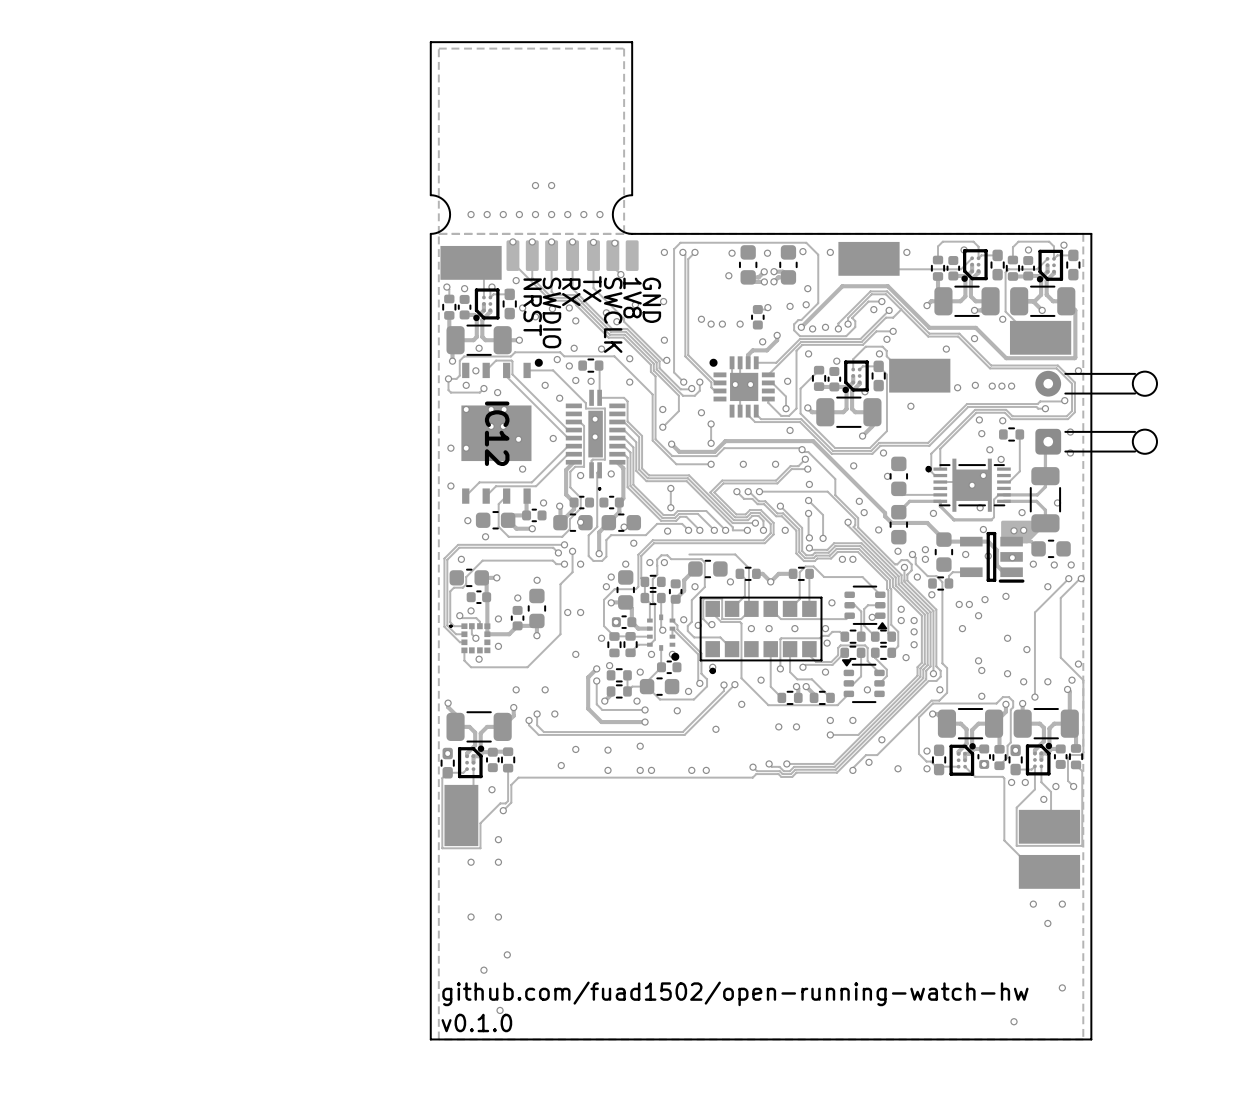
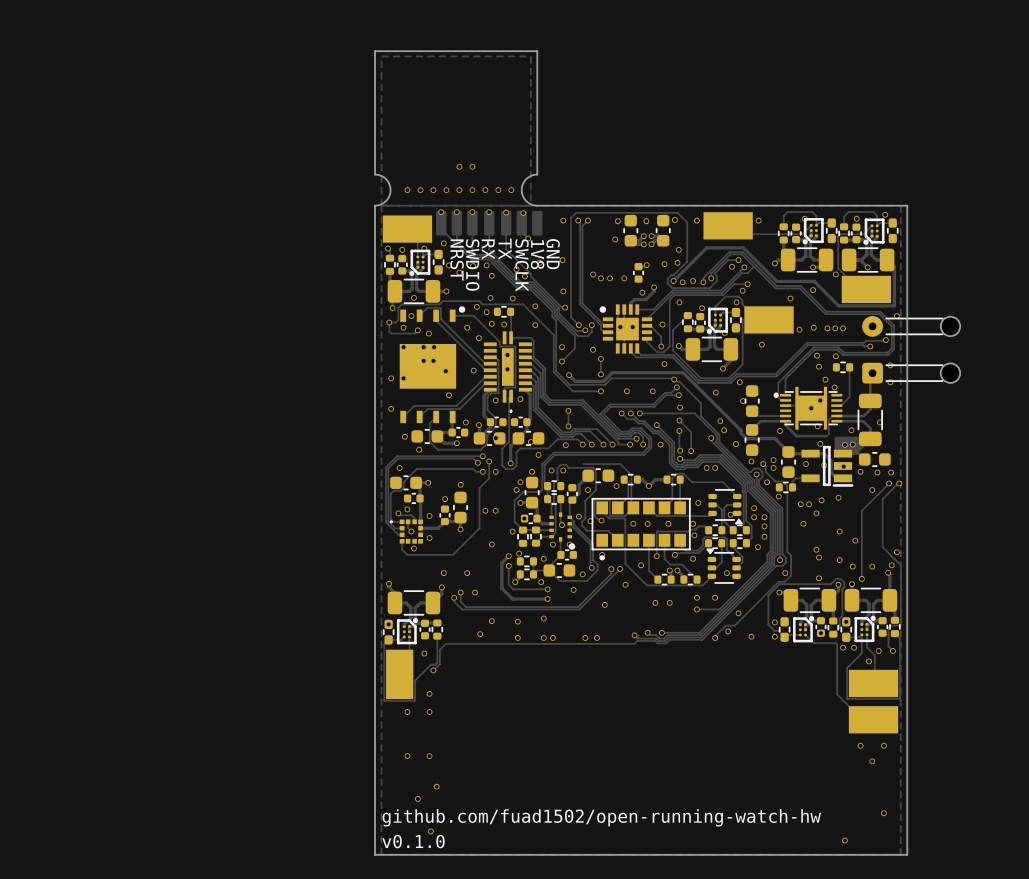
IC12 name: IC12 (497, 433) -> none

